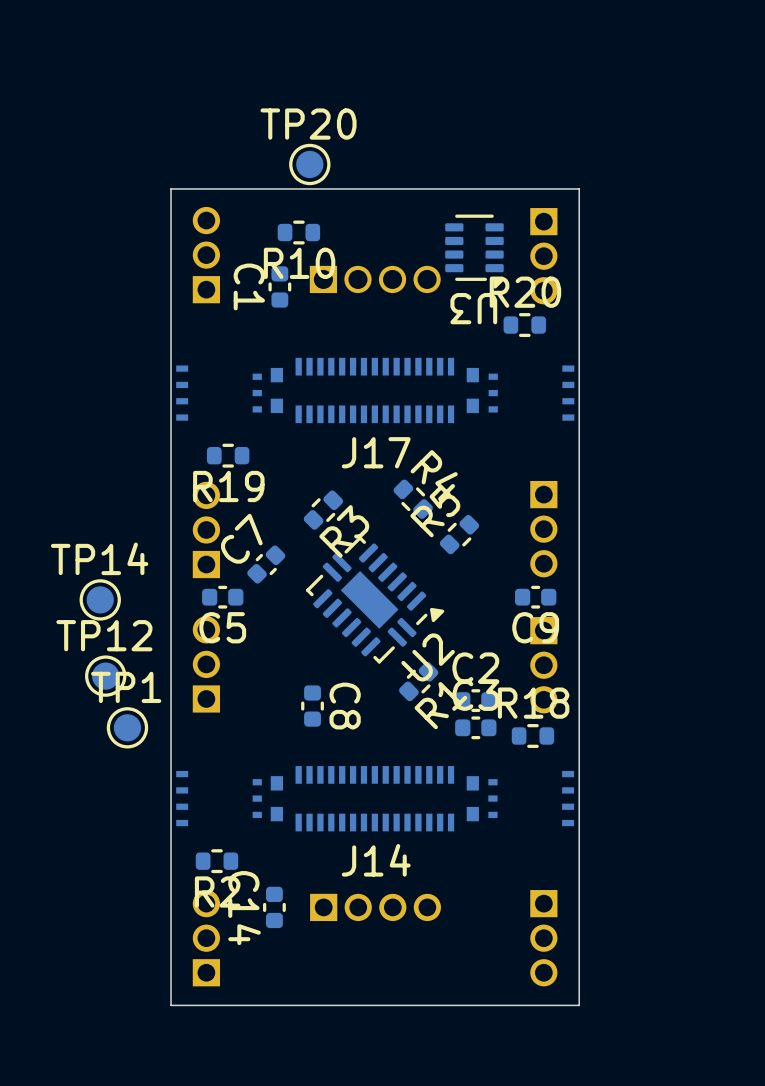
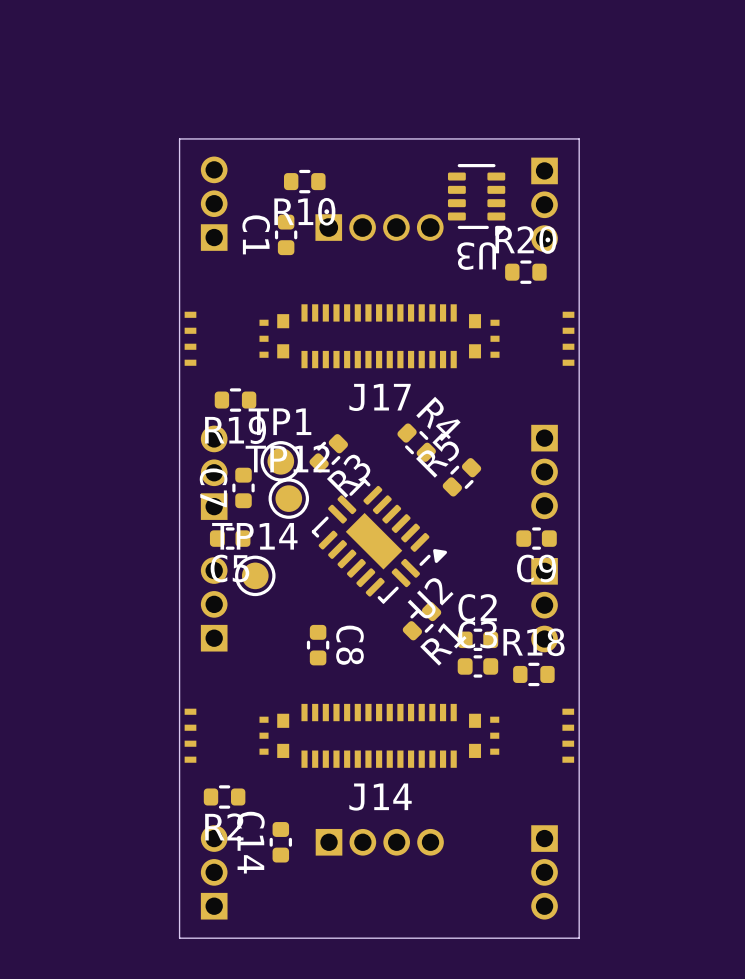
TP20: (309, 164) -> none
C7 rotation: 0° (266, 564) -> 45° counterclockwise (243, 487)
C7 position: (266, 564) -> (243, 487)
TP14 position: (100, 599) -> (255, 575)
TP12 position: (105, 676) -> (288, 498)
TP1 position: (127, 727) -> (280, 461)

